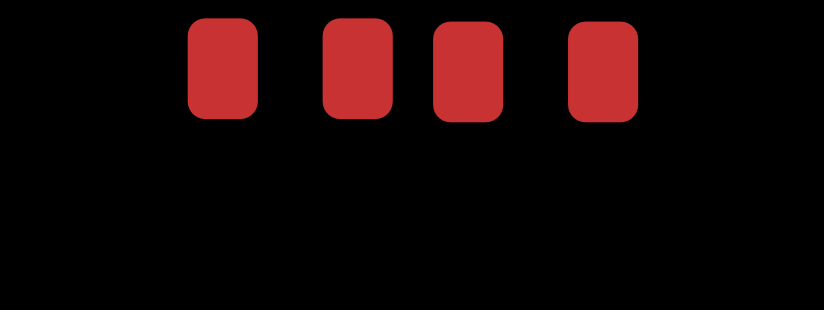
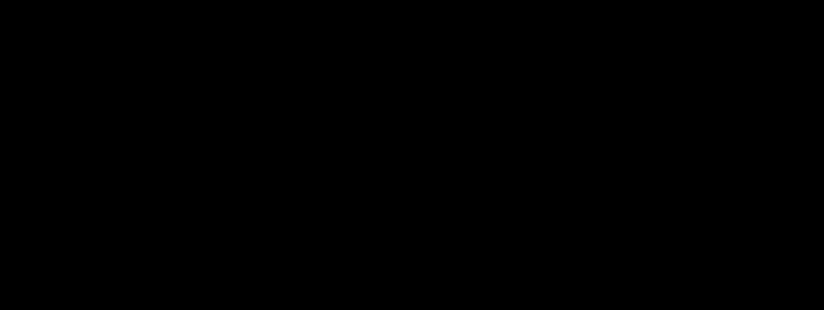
part: (290, 68) -> none
part: (535, 71) -> none

